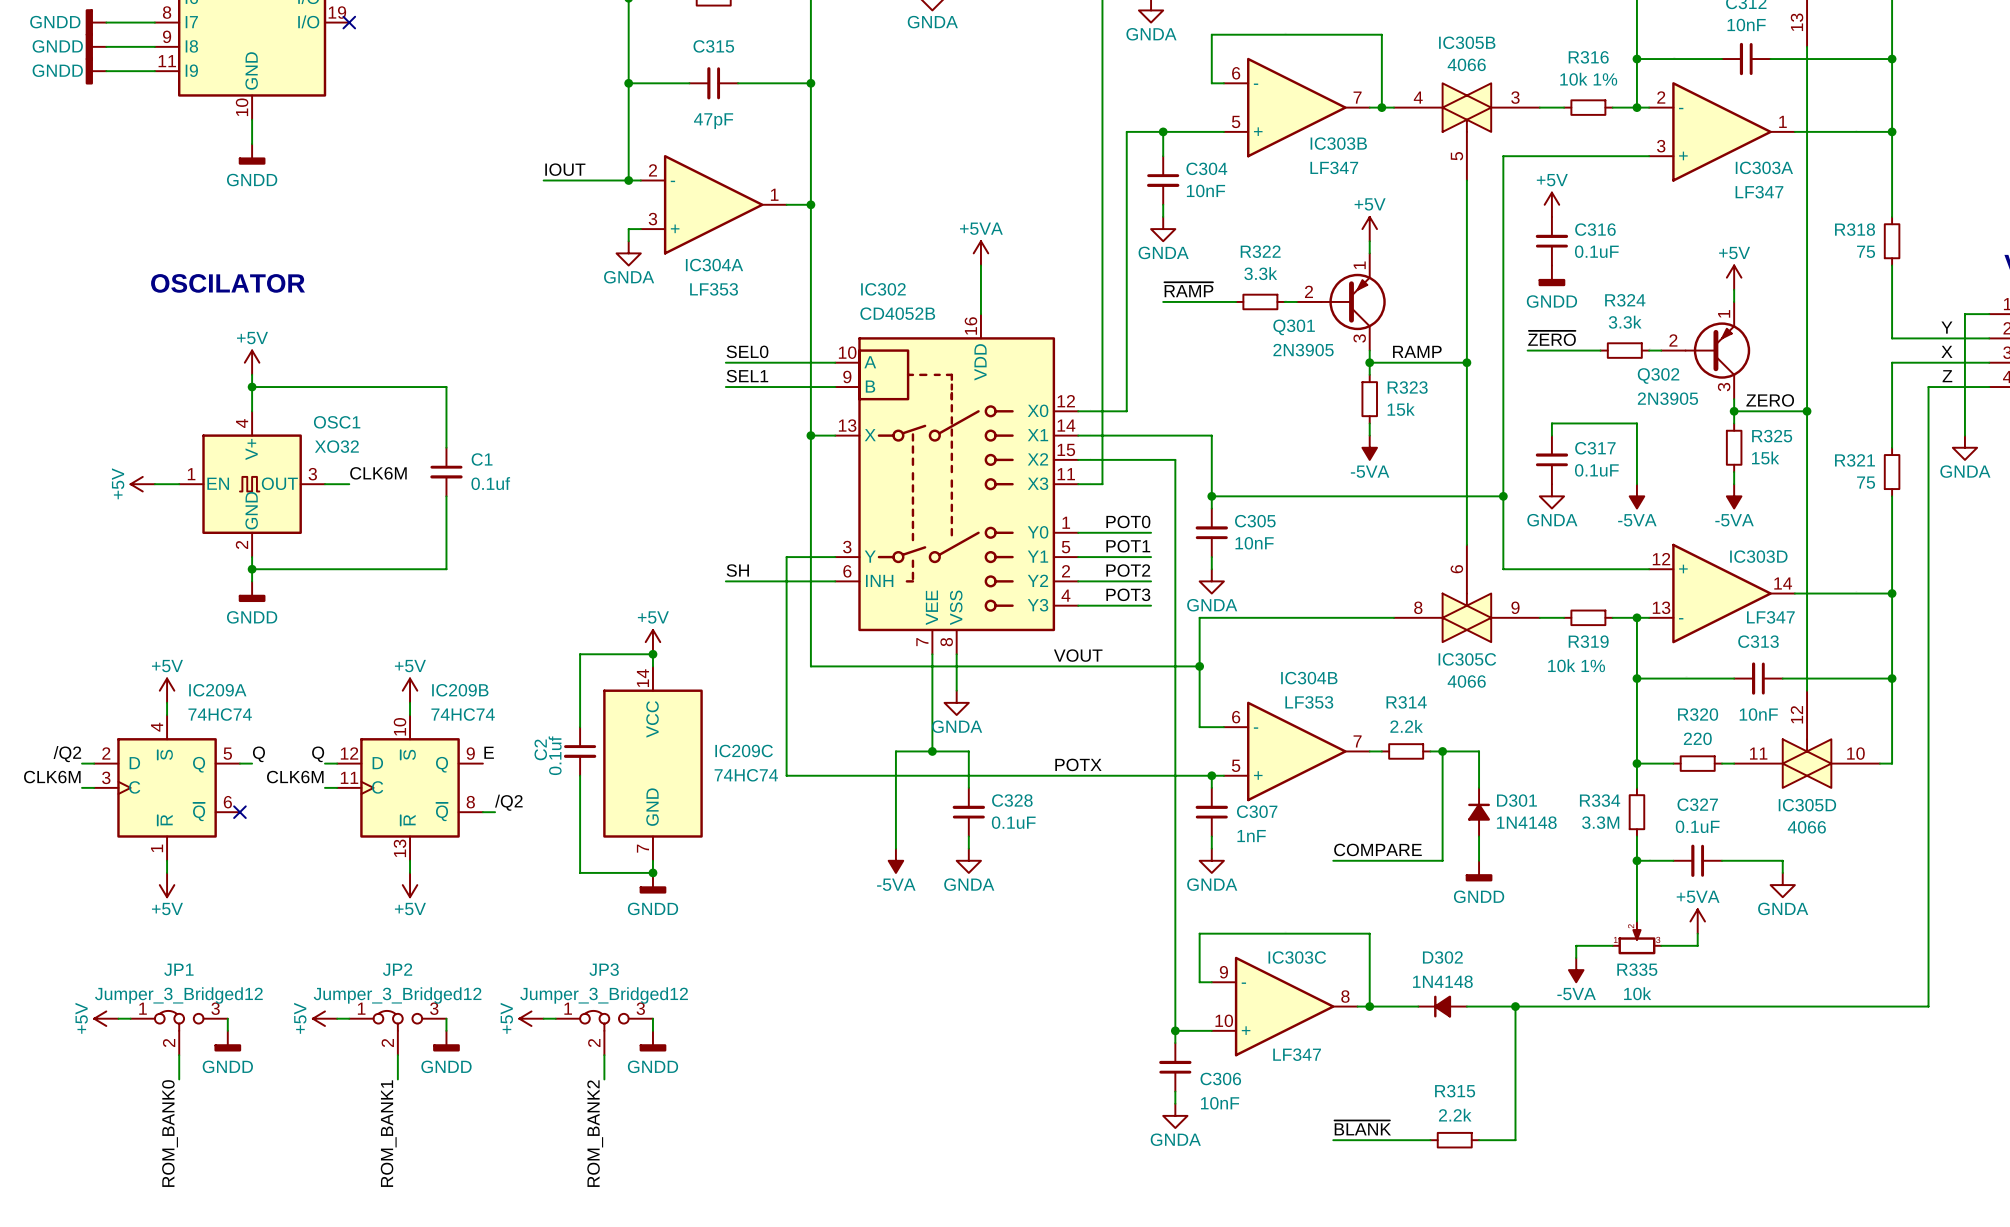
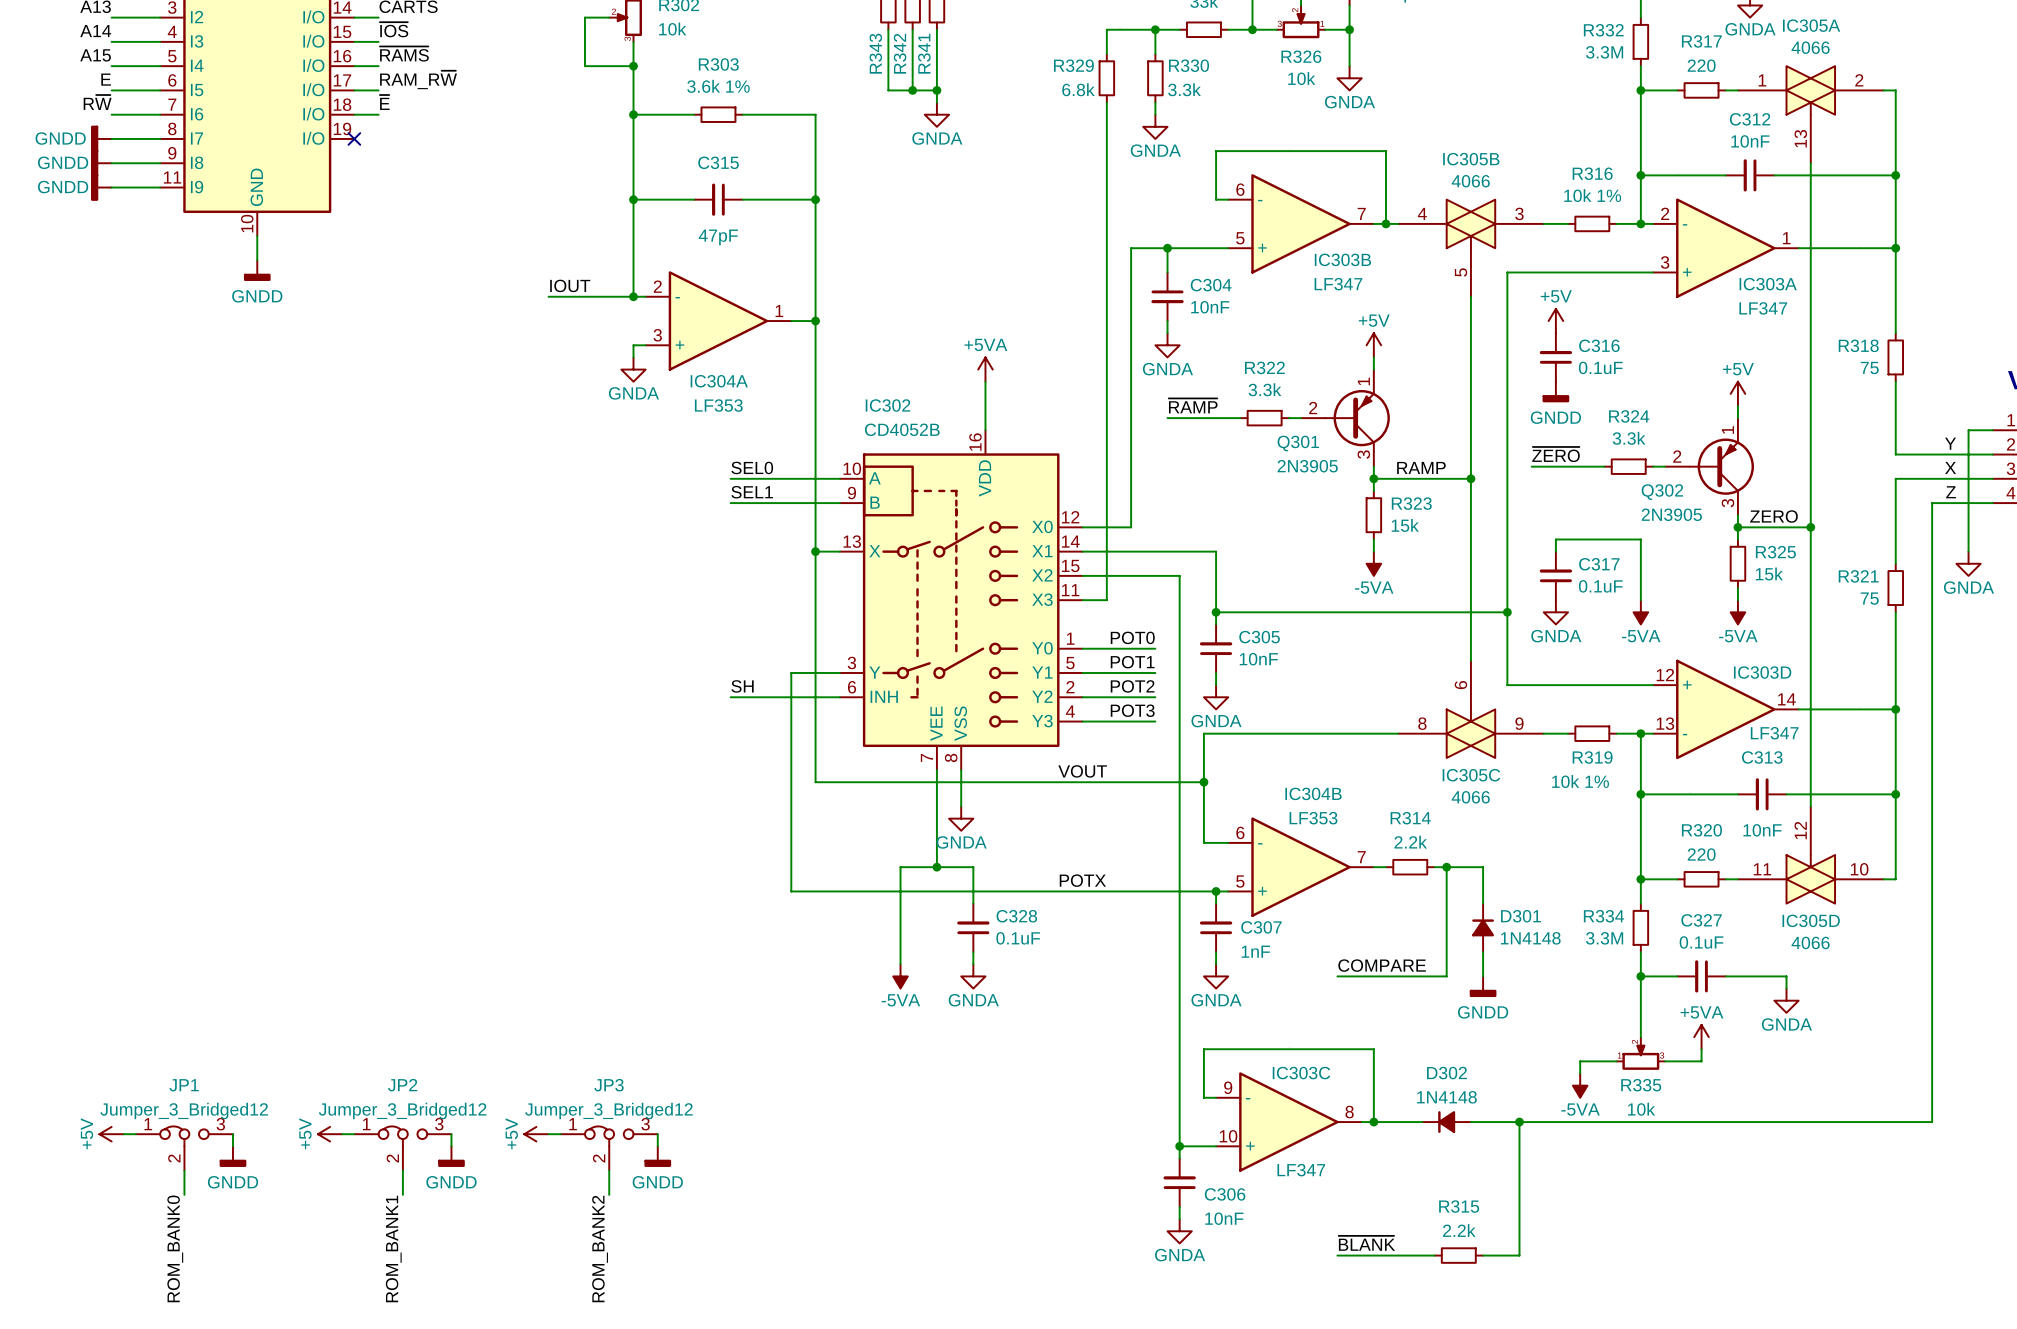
text: OSCILATOR (228, 283) -> none
power symbol: +5V (252, 362) -> none
wire: (252, 374) (252, 411) -> none
wire: (252, 387) (446, 387) (446, 447) -> none
junction: (252, 387) -> none
C1: 0.1uf (446, 472) -> none
label: CLK6M (378, 473) -> none
power symbol: +5V (142, 484) -> none
wire: (154, 484) (179, 484) -> none
OSC1: XO32 (252, 484) -> none
wire: (324, 484) (349, 484) -> none
wire: (446, 496) (446, 569) (252, 569) -> none
wire: (252, 557) (252, 581) -> none
junction: (252, 569) -> none
power symbol: GNDD (252, 591) -> none
power symbol: +5V (652, 642) -> none
junction: (652, 654) -> none
wire: (652, 666) (652, 654) (580, 654) (580, 727) -> none
power symbol: +5V (167, 690) -> none
power symbol: +5V (410, 690) -> none
wire: (167, 702) (167, 715) -> none
wire: (410, 702) (410, 715) -> none
C2: 0.1uf (580, 751) -> none
label: E (489, 752) -> none
label: /Q2 (67, 754) -> none
label: Q (258, 754) -> none
label: Q (318, 754) -> none
wire: (82, 763) (94, 763) -> none
wire: (239, 763) (252, 763) -> none
wire: (324, 763) (337, 763) -> none
IC209C: 74HC74 (652, 763) -> none
wire: (580, 775) (580, 872) (652, 872) (652, 860) -> none
label: CLK6M (52, 777) -> none
label: CLK6M (295, 777) -> none
wire: (82, 787) (94, 787) -> none
IC209A: 74HC74 (167, 787) -> none
wire: (324, 787) (337, 787) -> none
IC209B: 74HC74 (410, 787) -> none
label: /Q2 (508, 802) -> none
no-connect mark: (239, 812) -> none
wire: (482, 812) (495, 812) -> none
wire: (167, 860) (167, 872) -> none
wire: (410, 860) (410, 872) -> none
junction: (652, 872) -> none
power symbol: GNDD (652, 883) -> none
power symbol: +5V (167, 885) -> none
power symbol: +5V (410, 885) -> none

